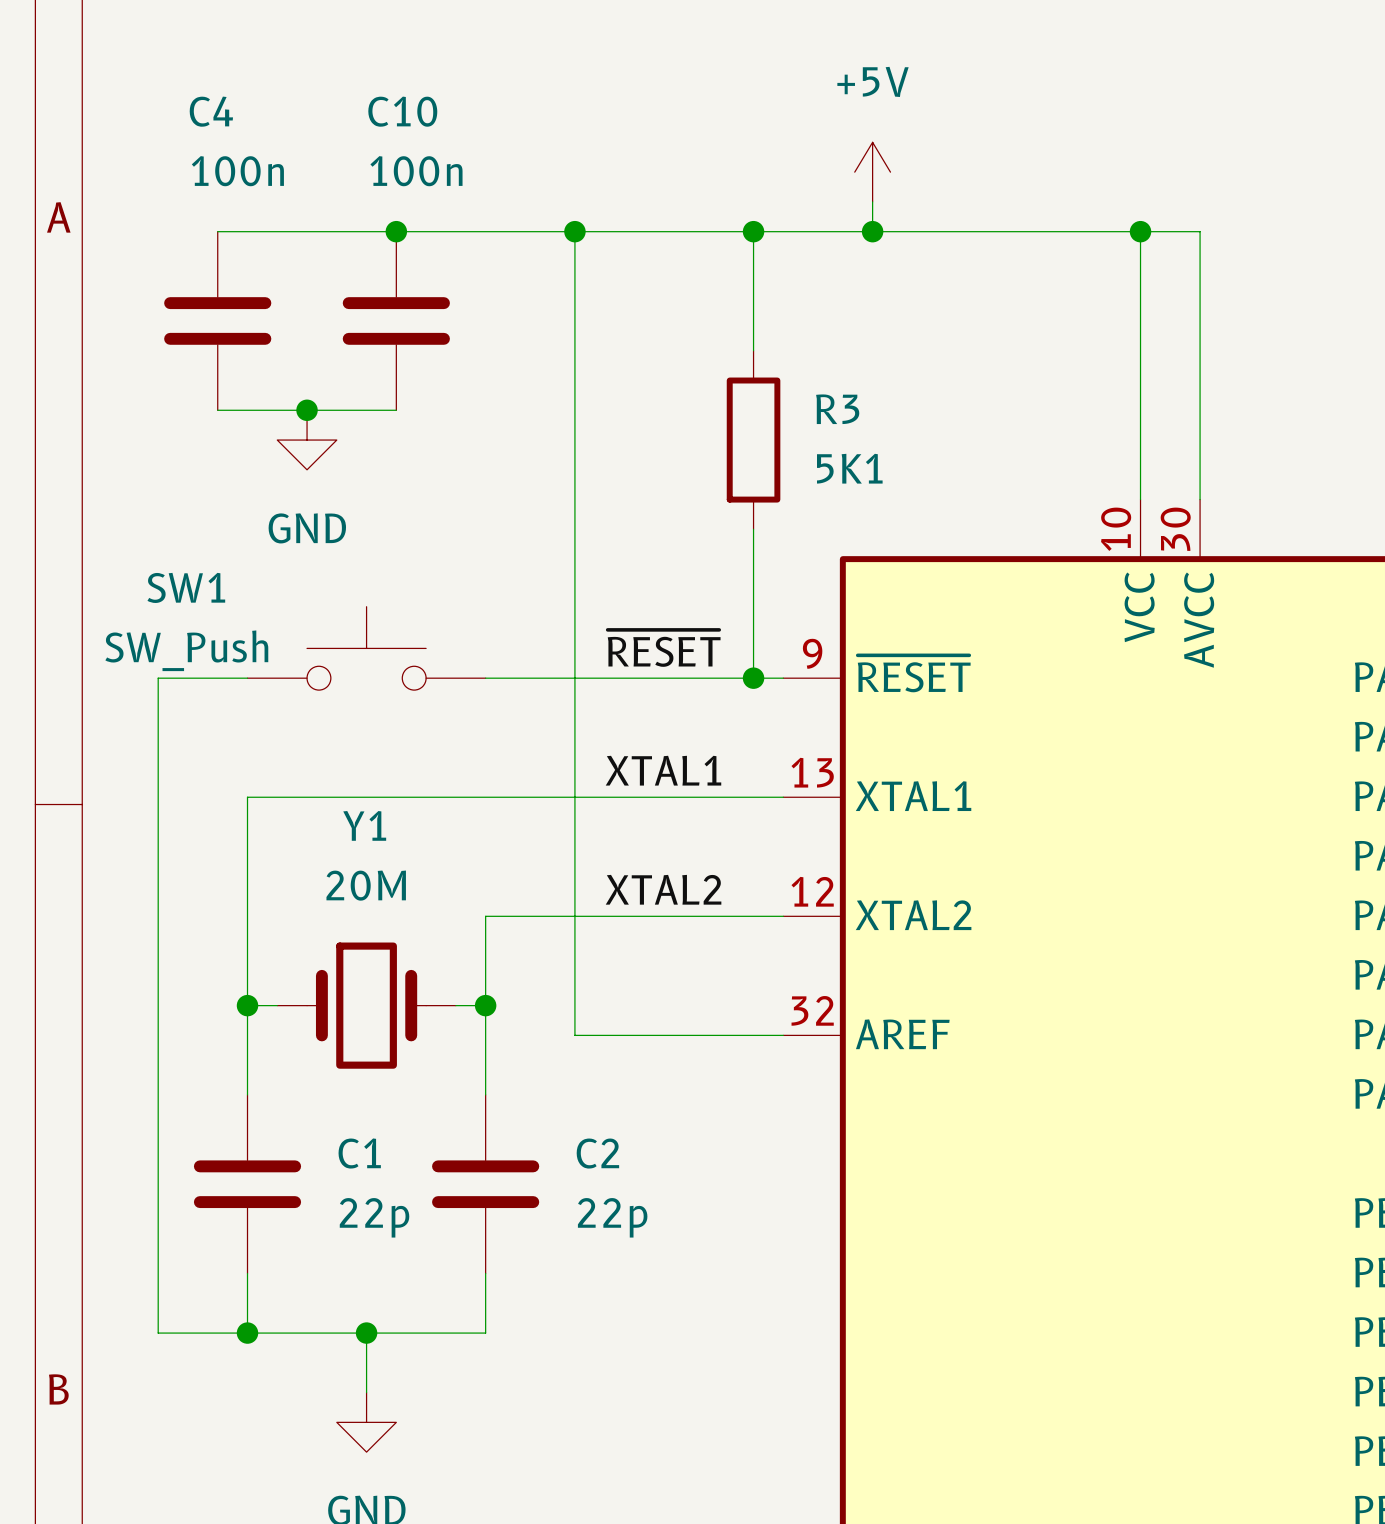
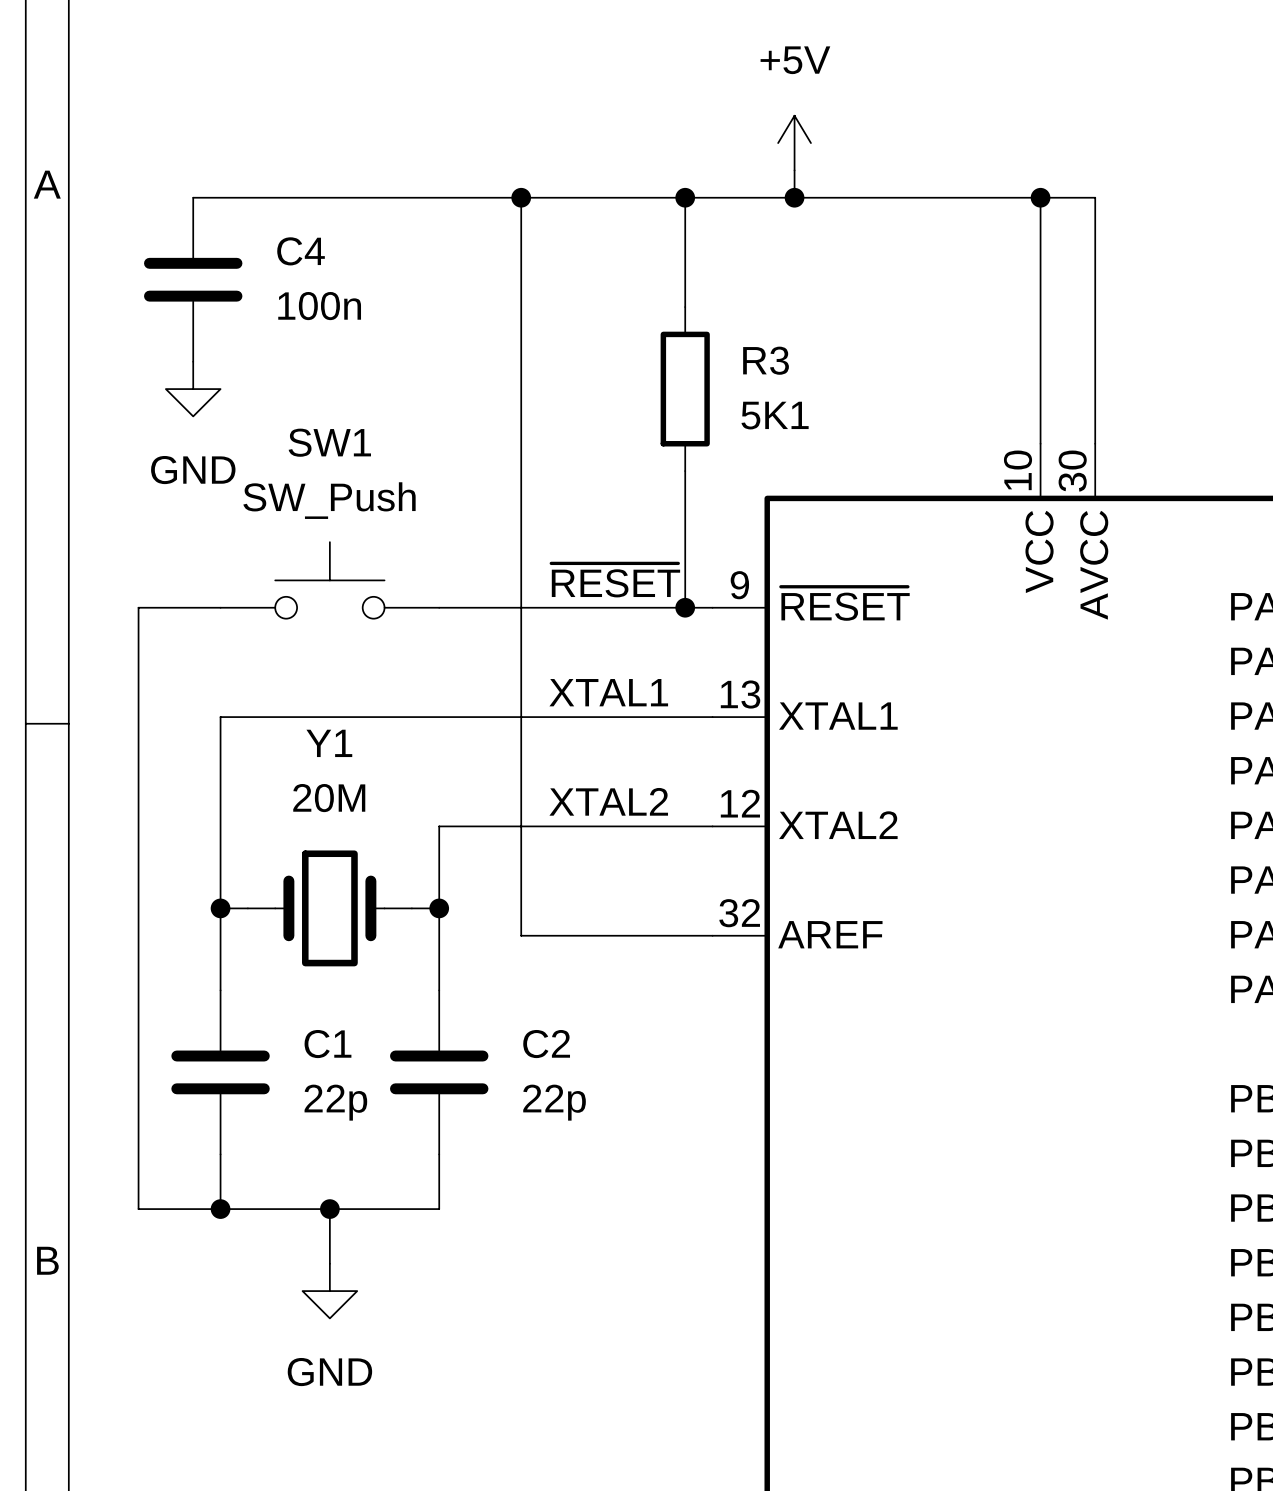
C4 name position: C4 (211, 111) -> C4 (301, 251)
C4 value position: 100n (237, 171) -> 100n (319, 306)
junction: (396, 231) -> none
C10: 100n (396, 320) -> none
wire: (217, 410) (396, 410) -> none
junction: (307, 410) -> none
power symbol position: GND (307, 440) -> GND (193, 389)
SW1 name position: SW1 (186, 587) -> SW1 (329, 442)
SW1 value position: SW_Push (186, 650) -> SW_Push (329, 500)

